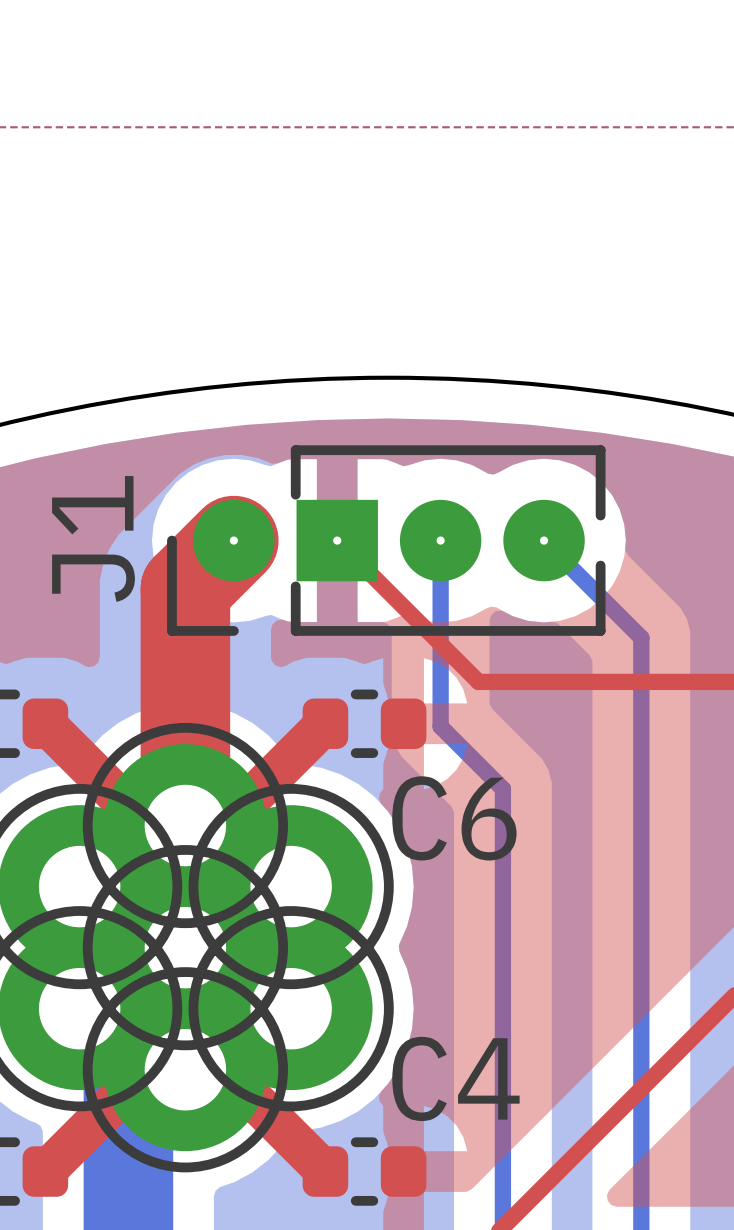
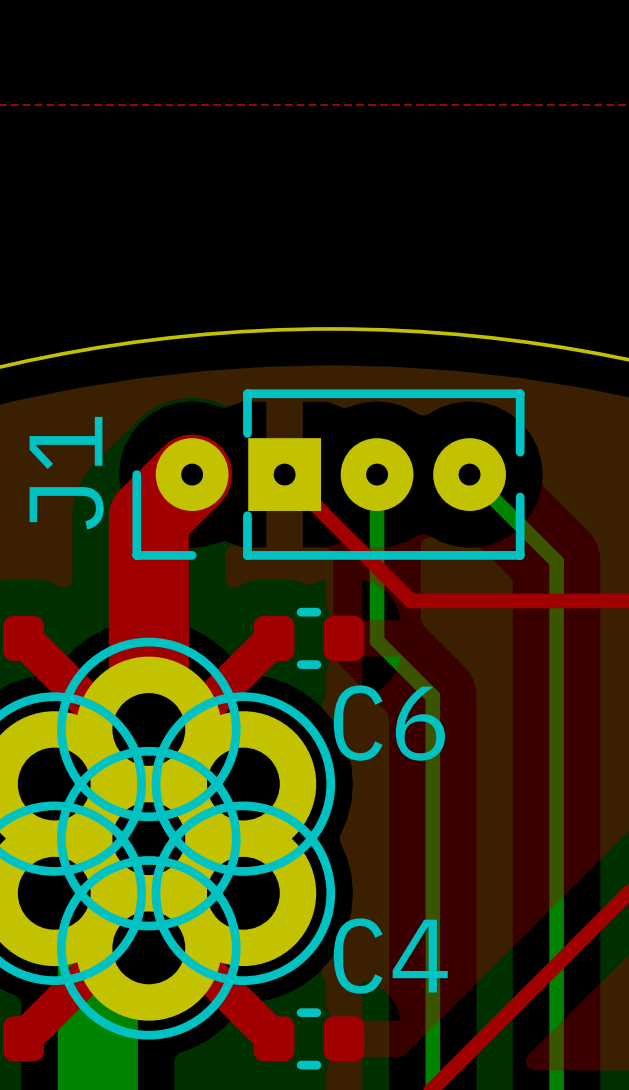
J1 footprint: [167, 445, 606, 636] -> [132, 389, 525, 560]

